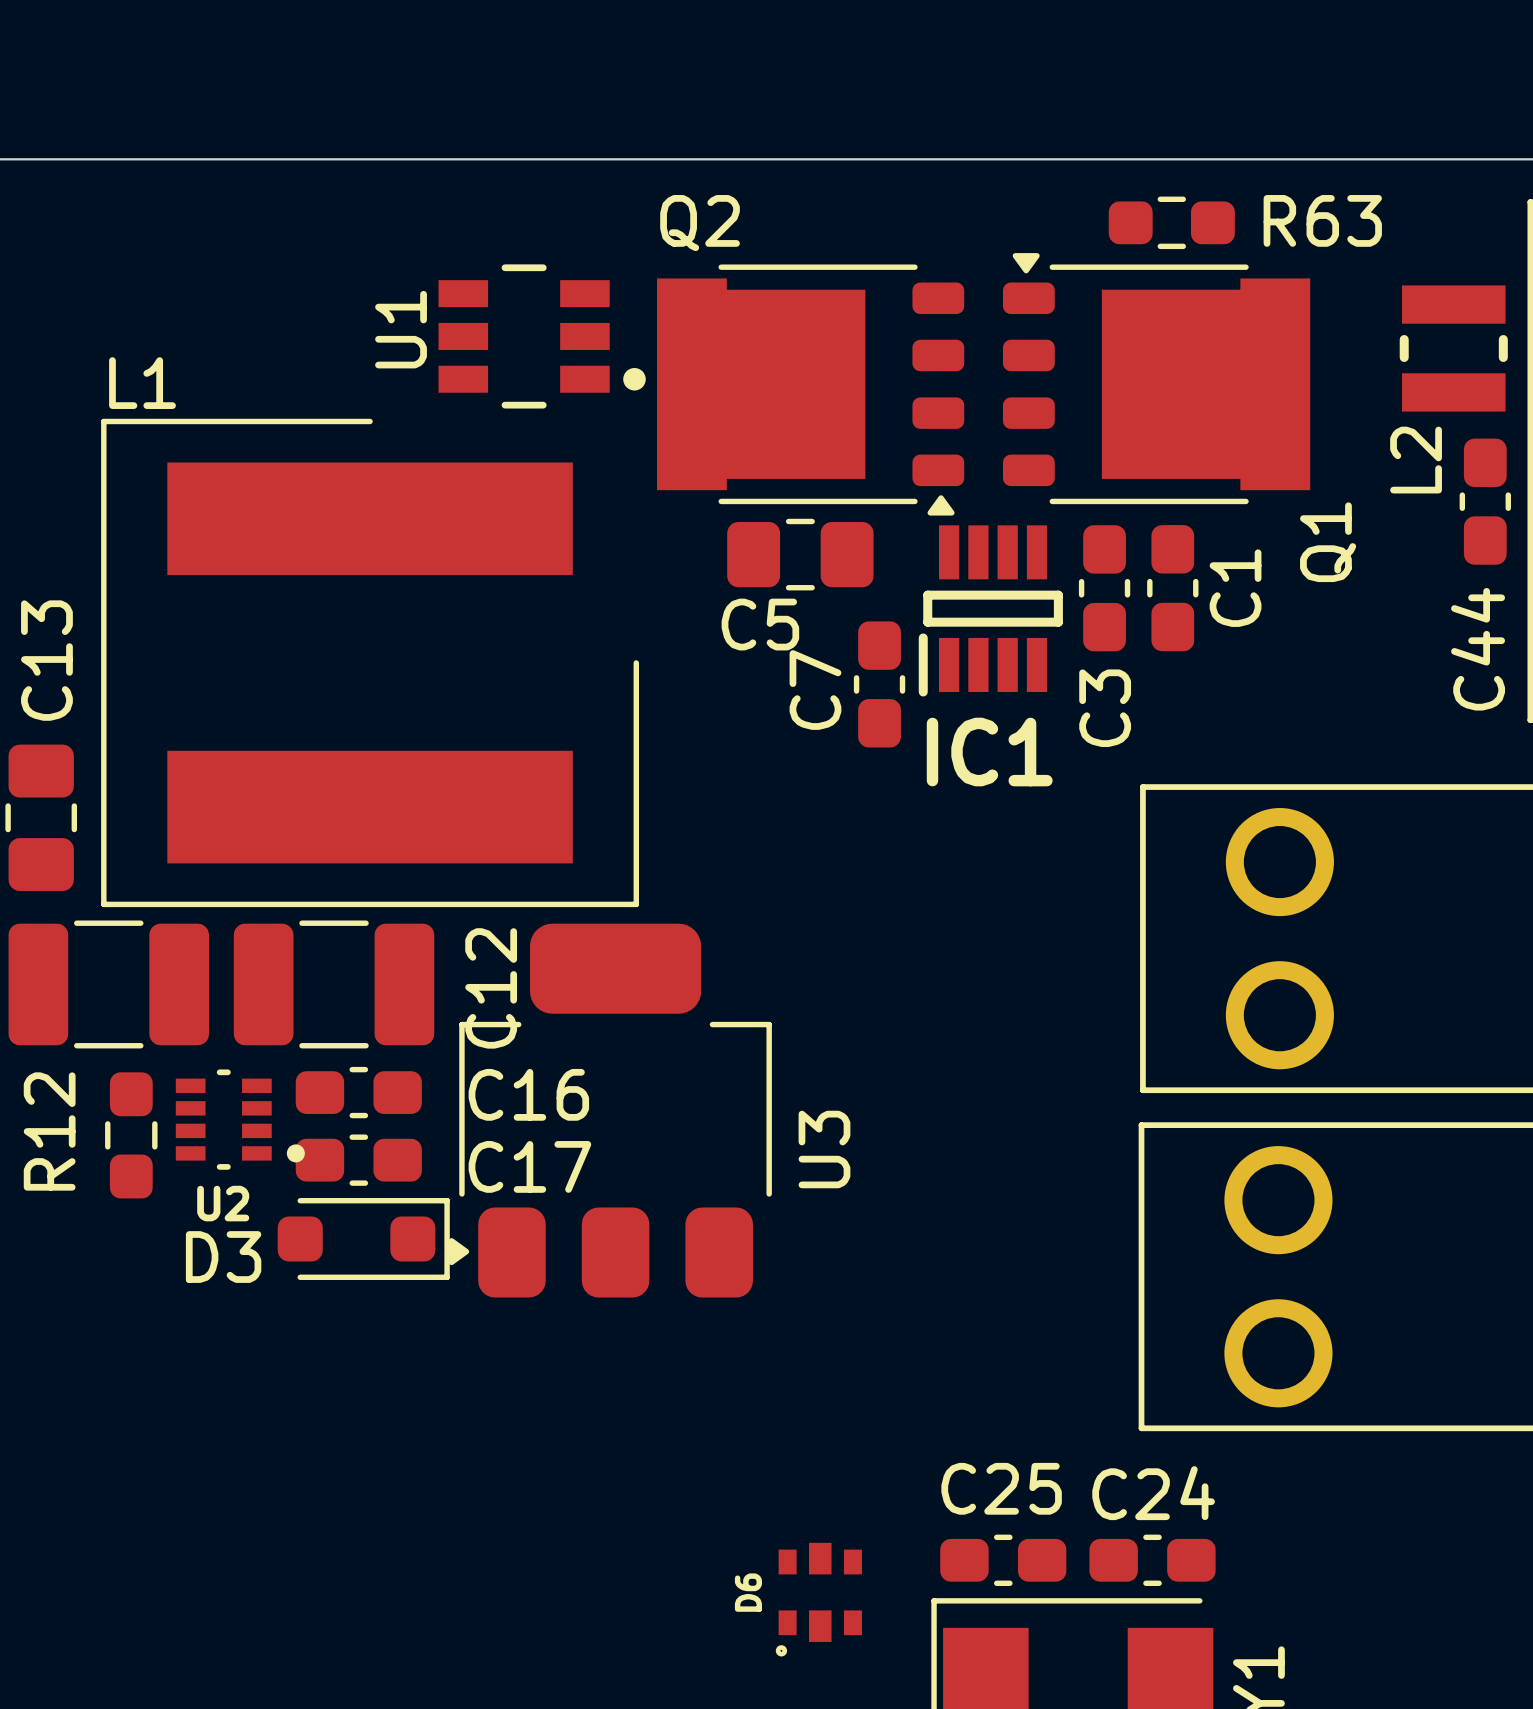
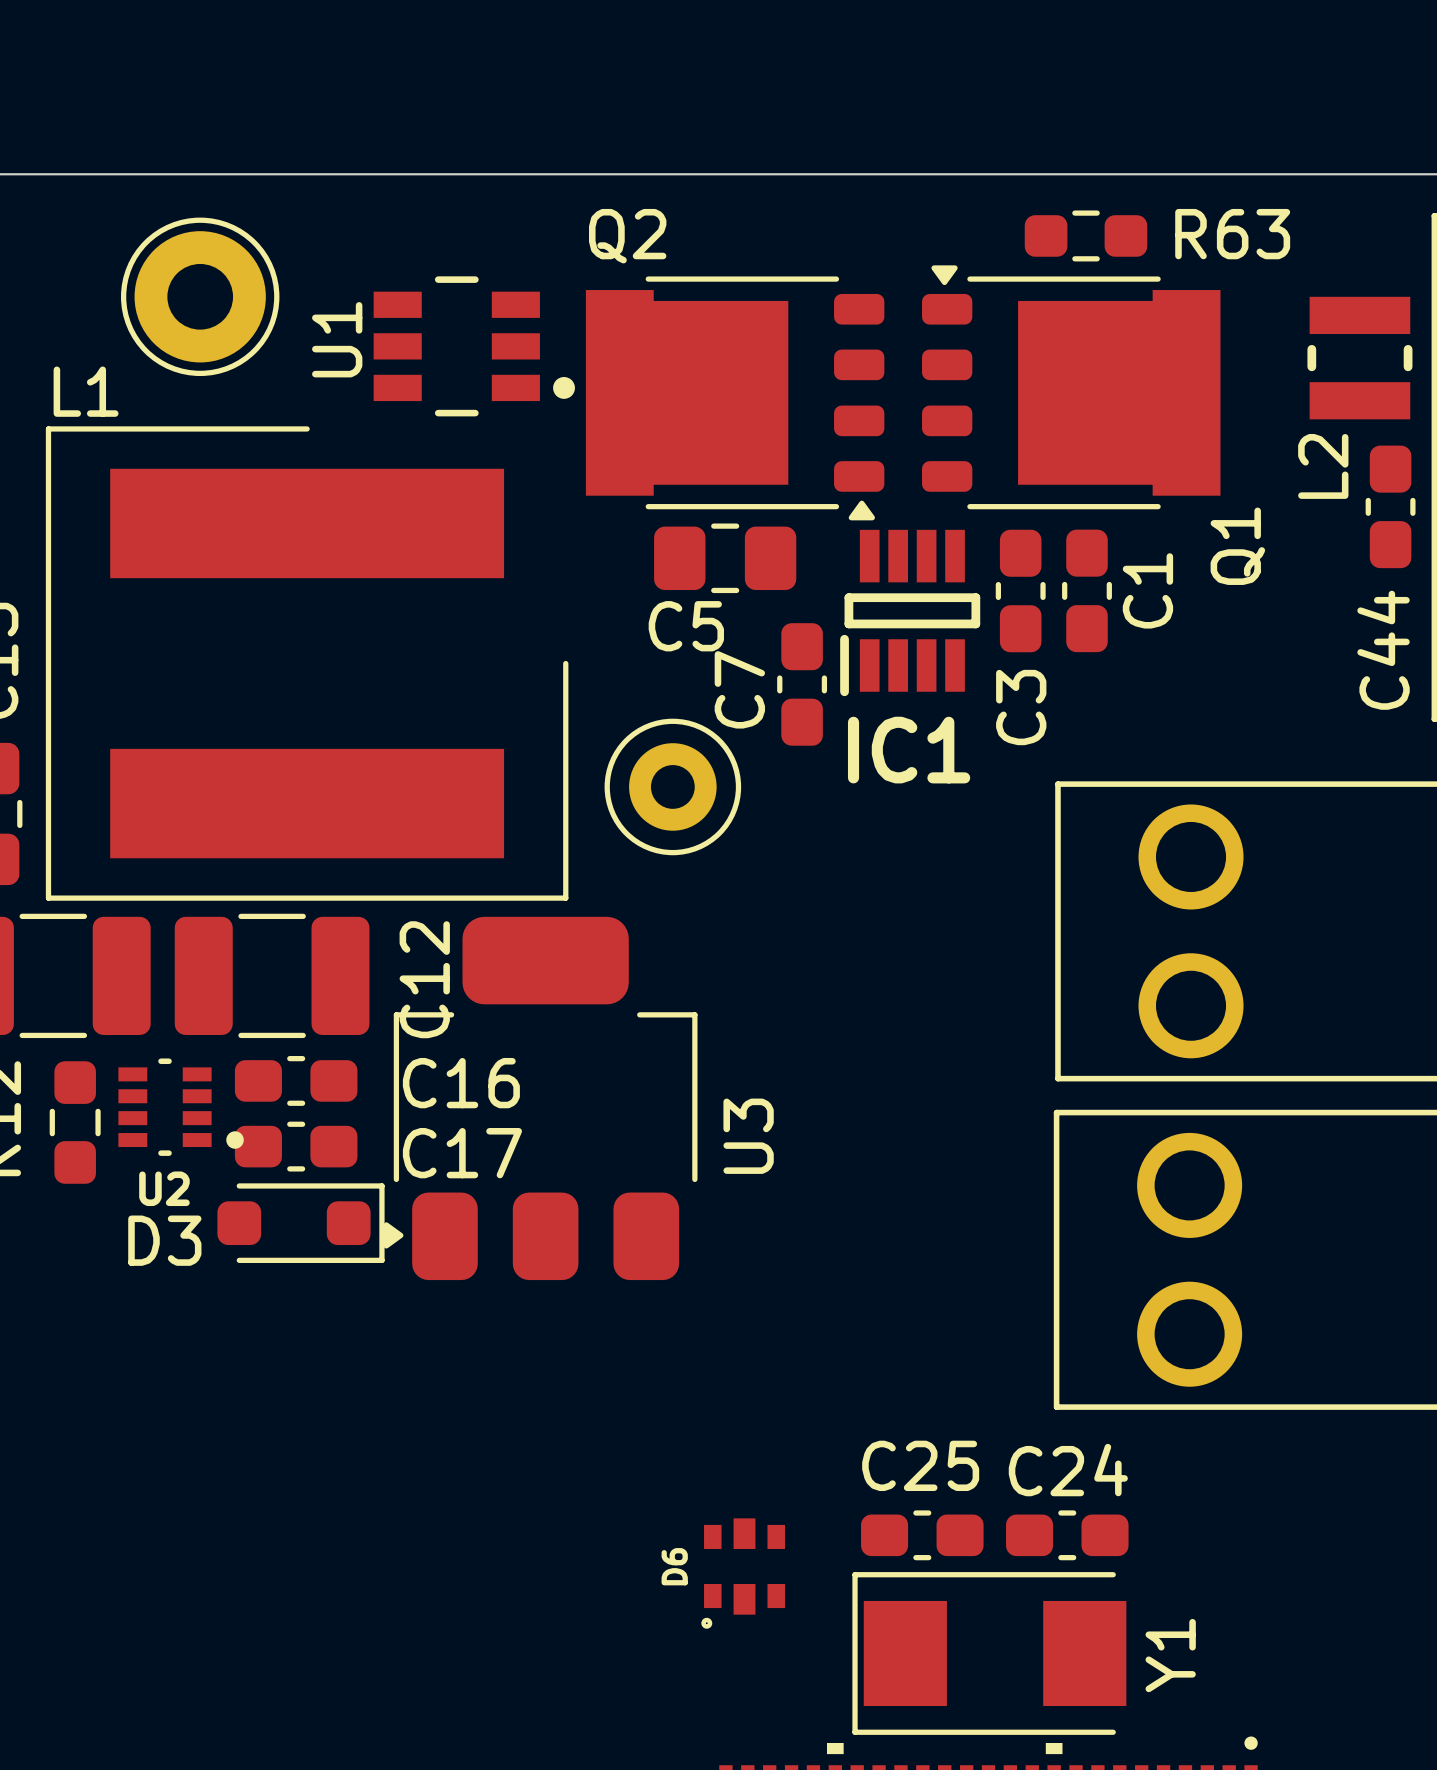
part: none -> (200, 296)
part: none -> (672, 786)

